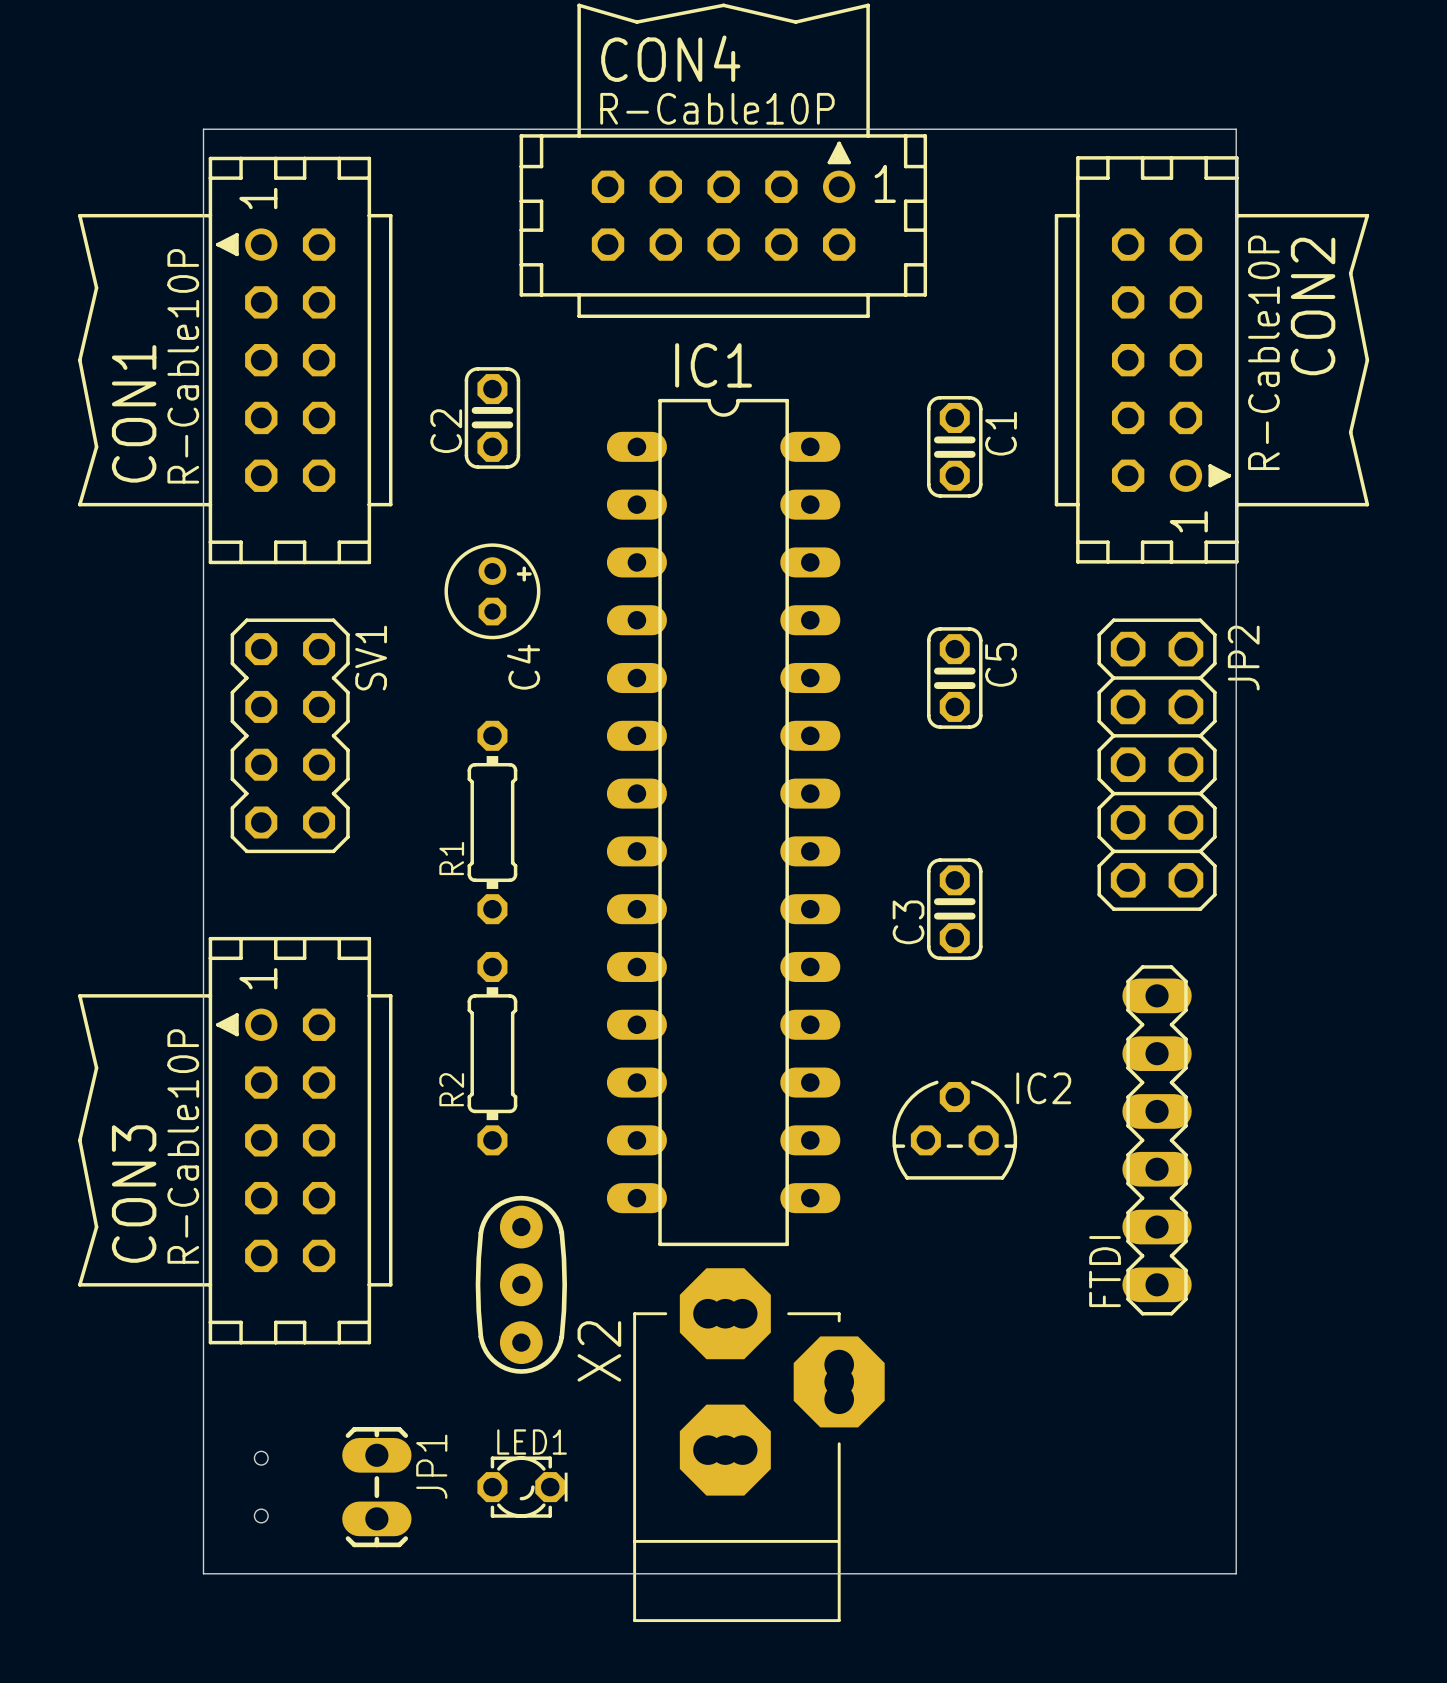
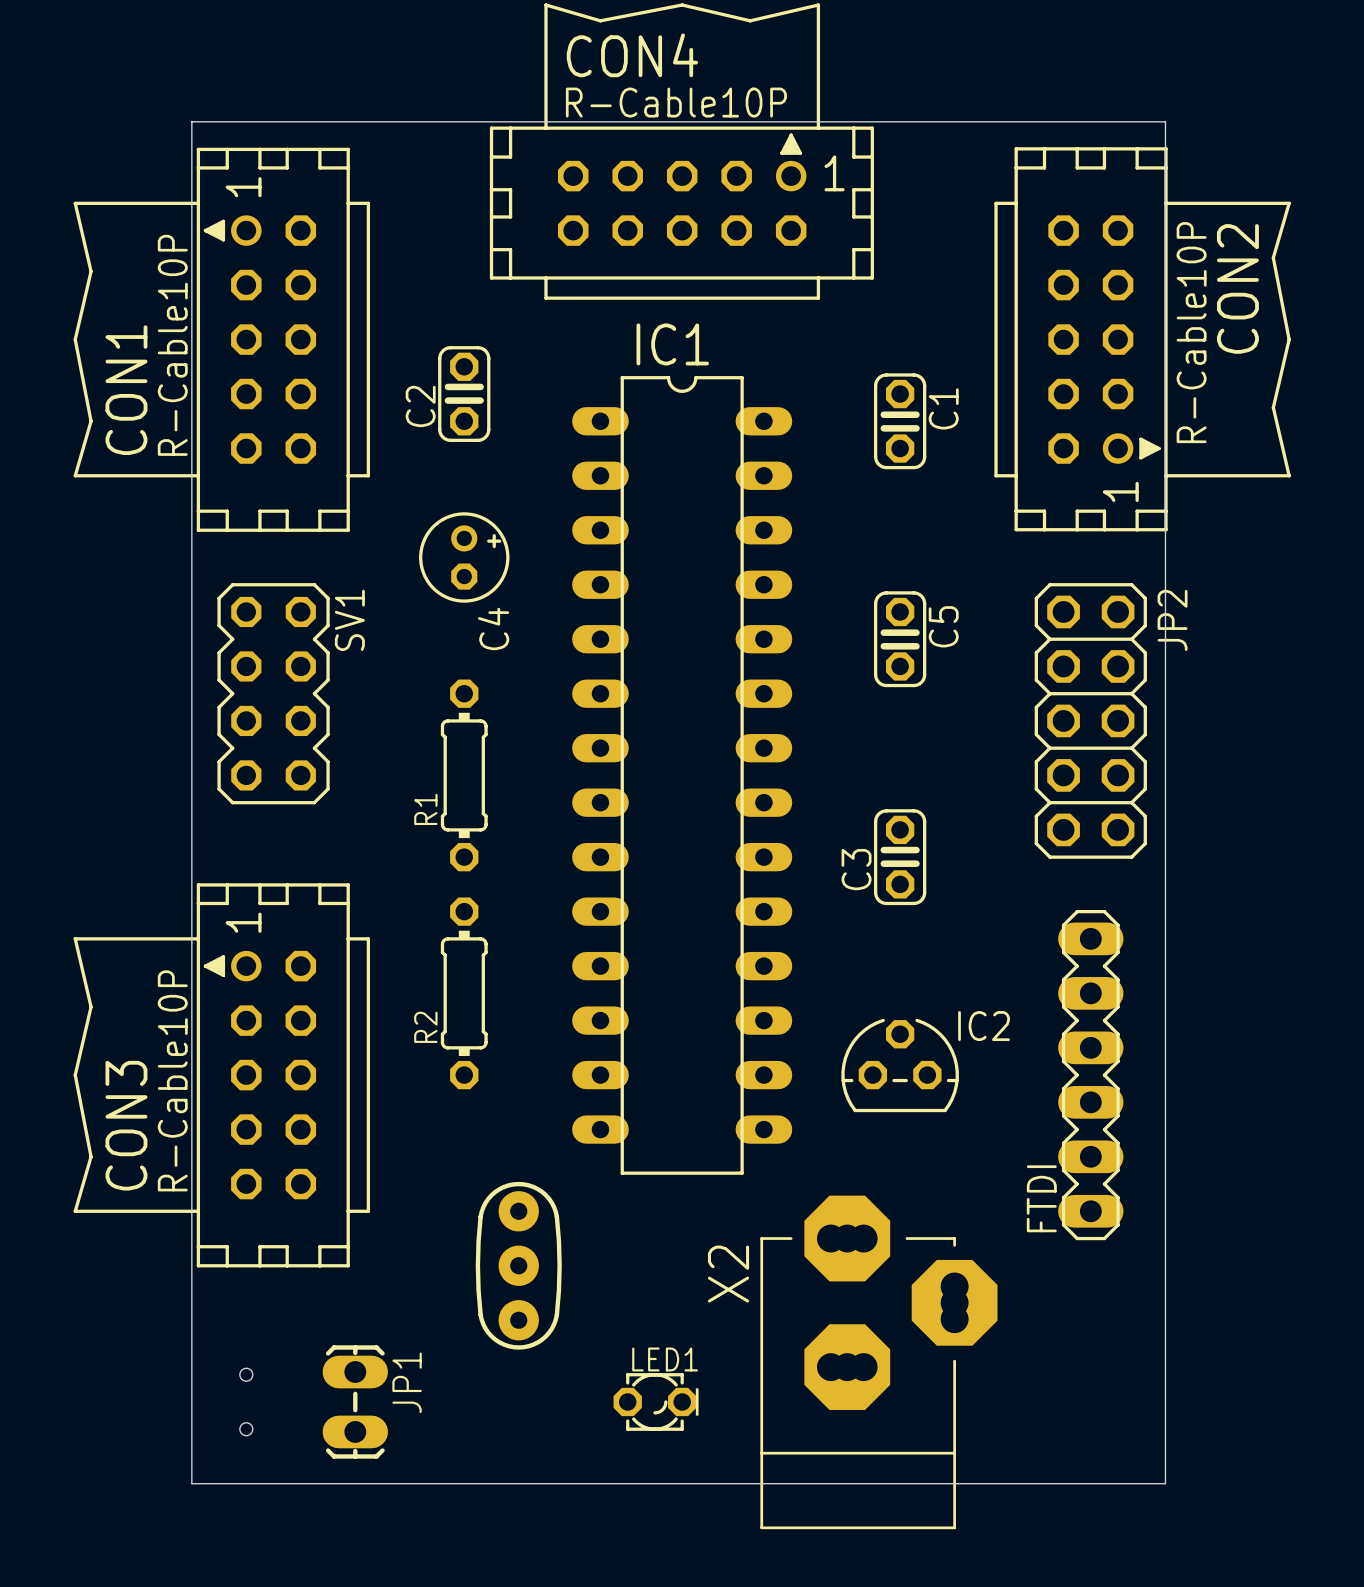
part position: (521, 1284) -> (518, 1265)
X2 position: (758, 1445) -> (878, 1362)
LED1 position: (522, 1487) -> (656, 1401)

